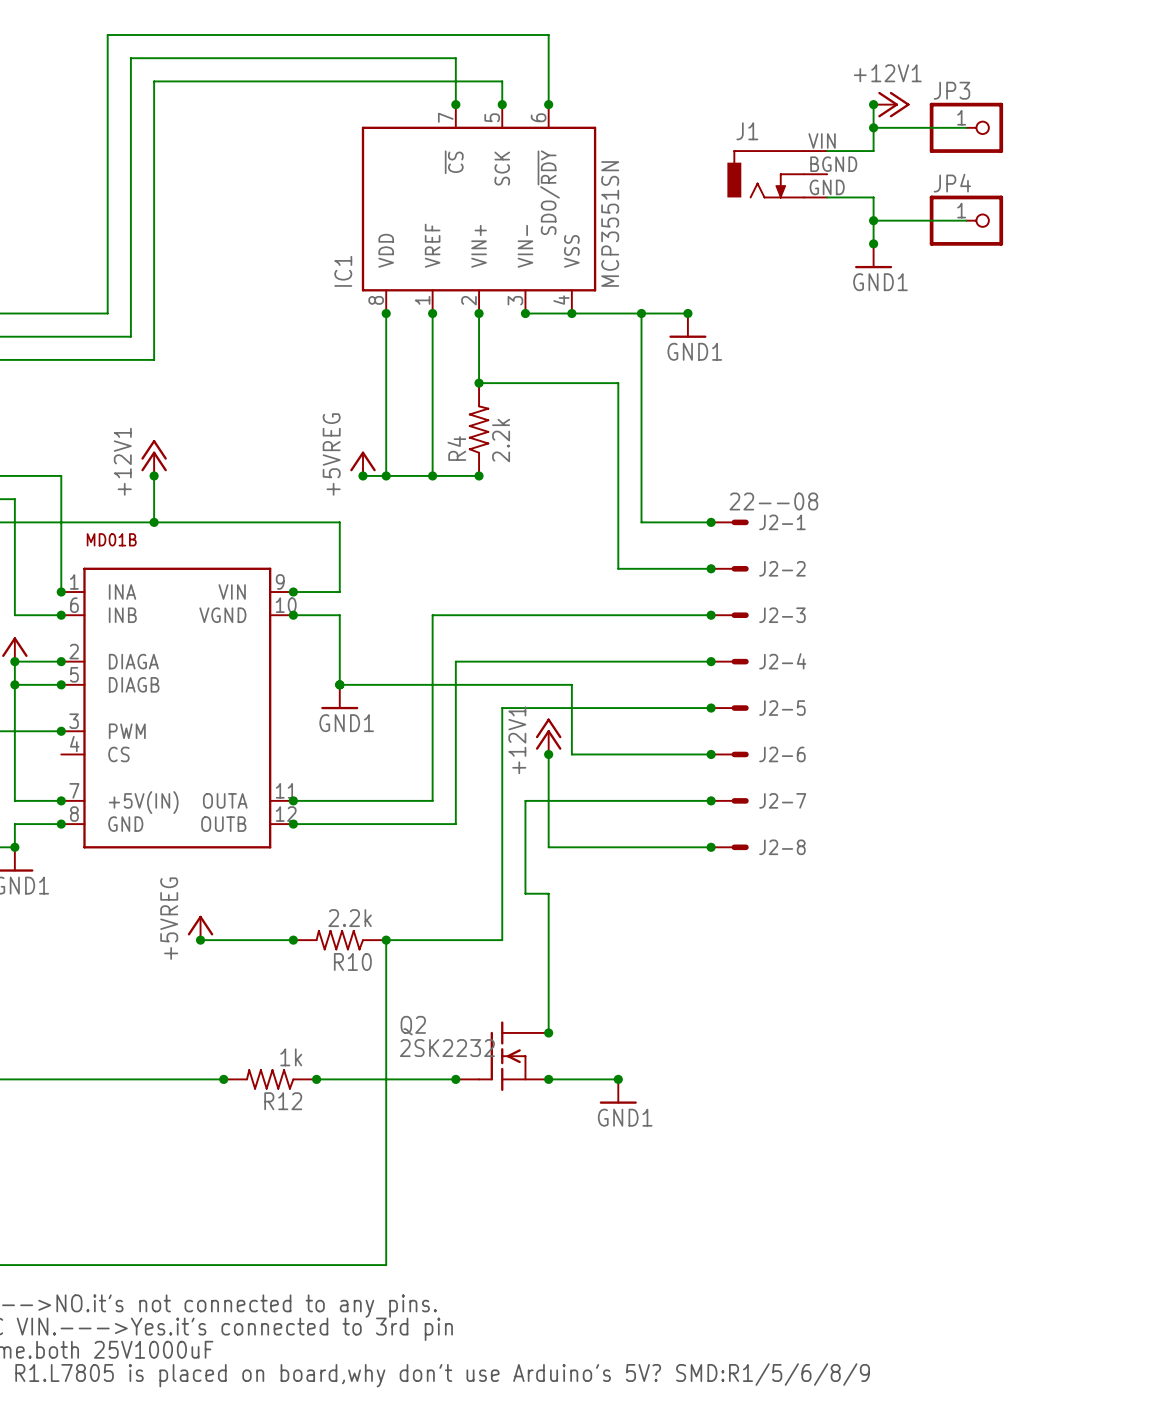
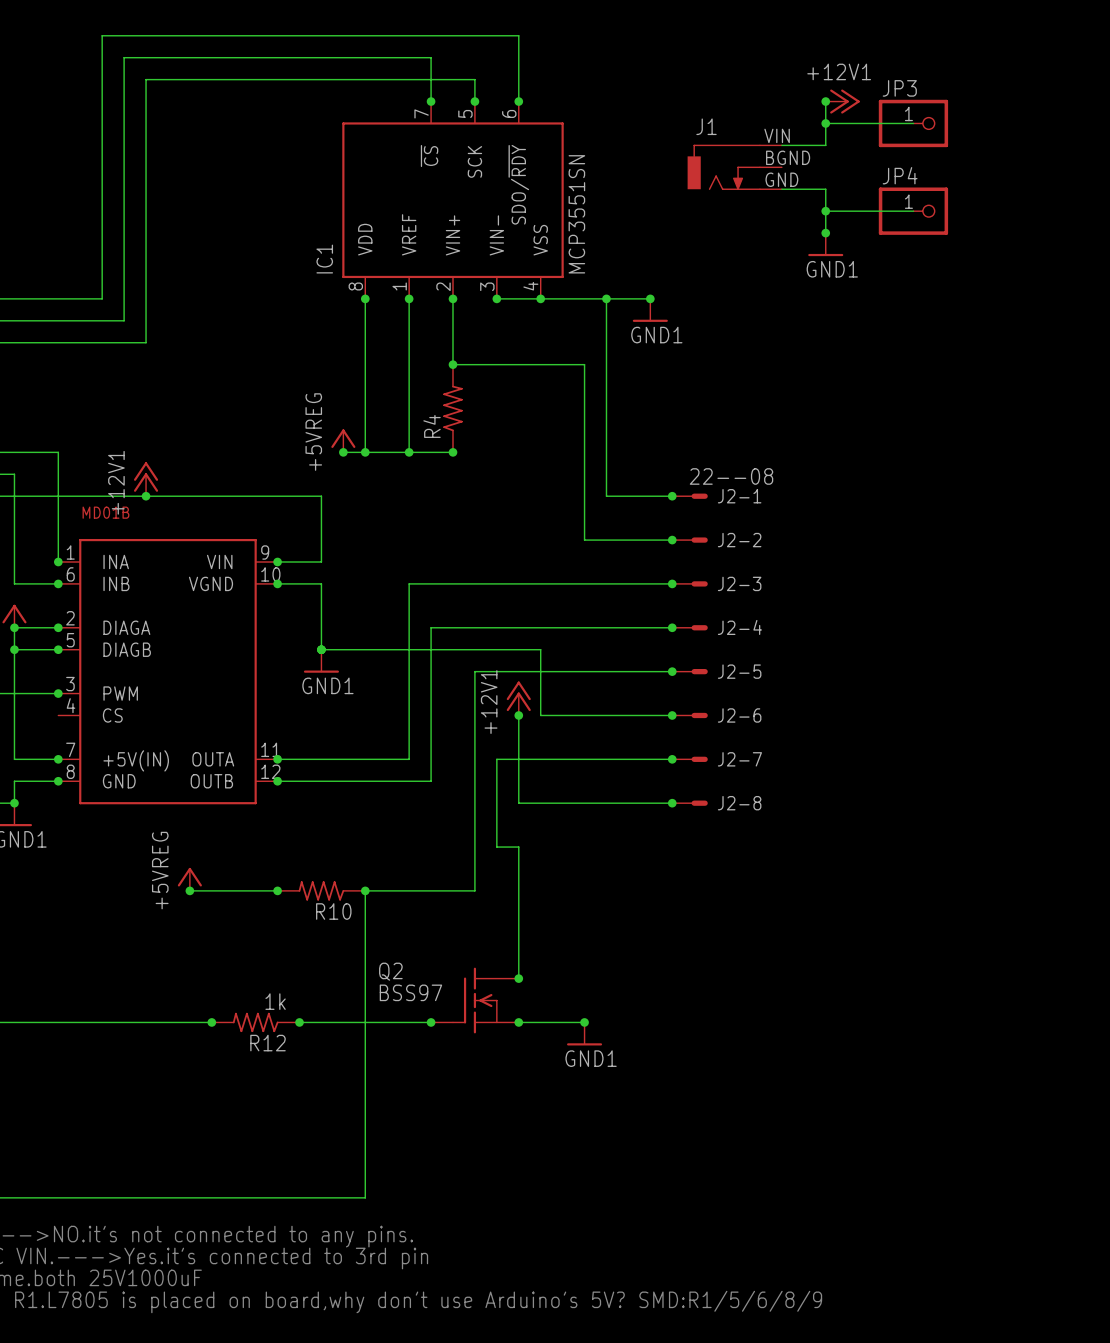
R4 value: 2.2k (501, 440) -> none
power symbol position: +12V1 (154, 457) -> +12V1 (146, 479)
junction: (154, 475) -> none
R10 value: 2.2k (350, 918) -> none
Q2 value: 2SK2232 (447, 1048) -> BSS97 (410, 992)

